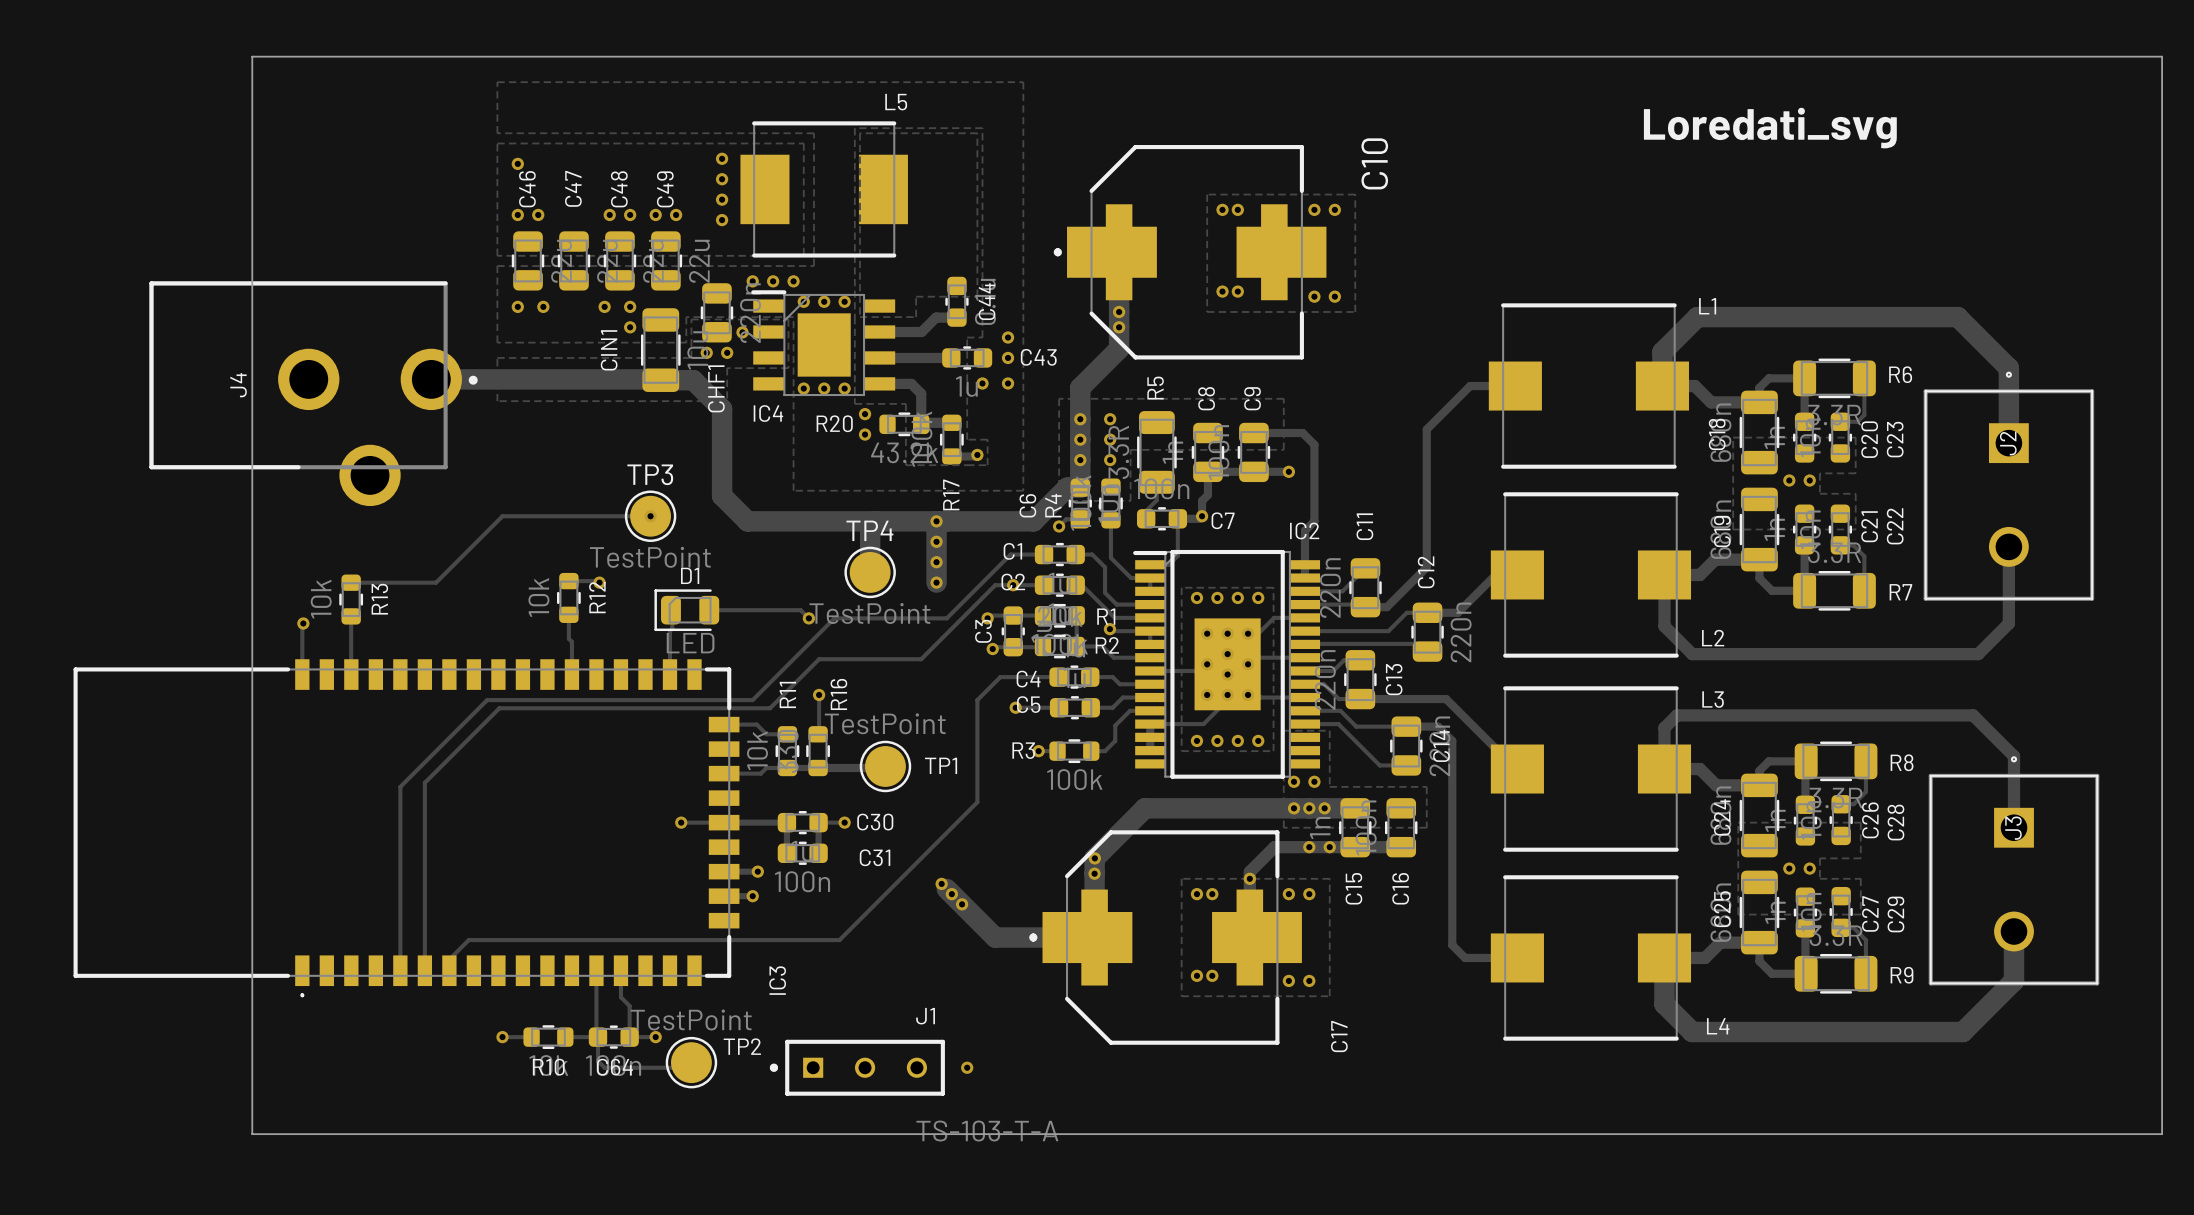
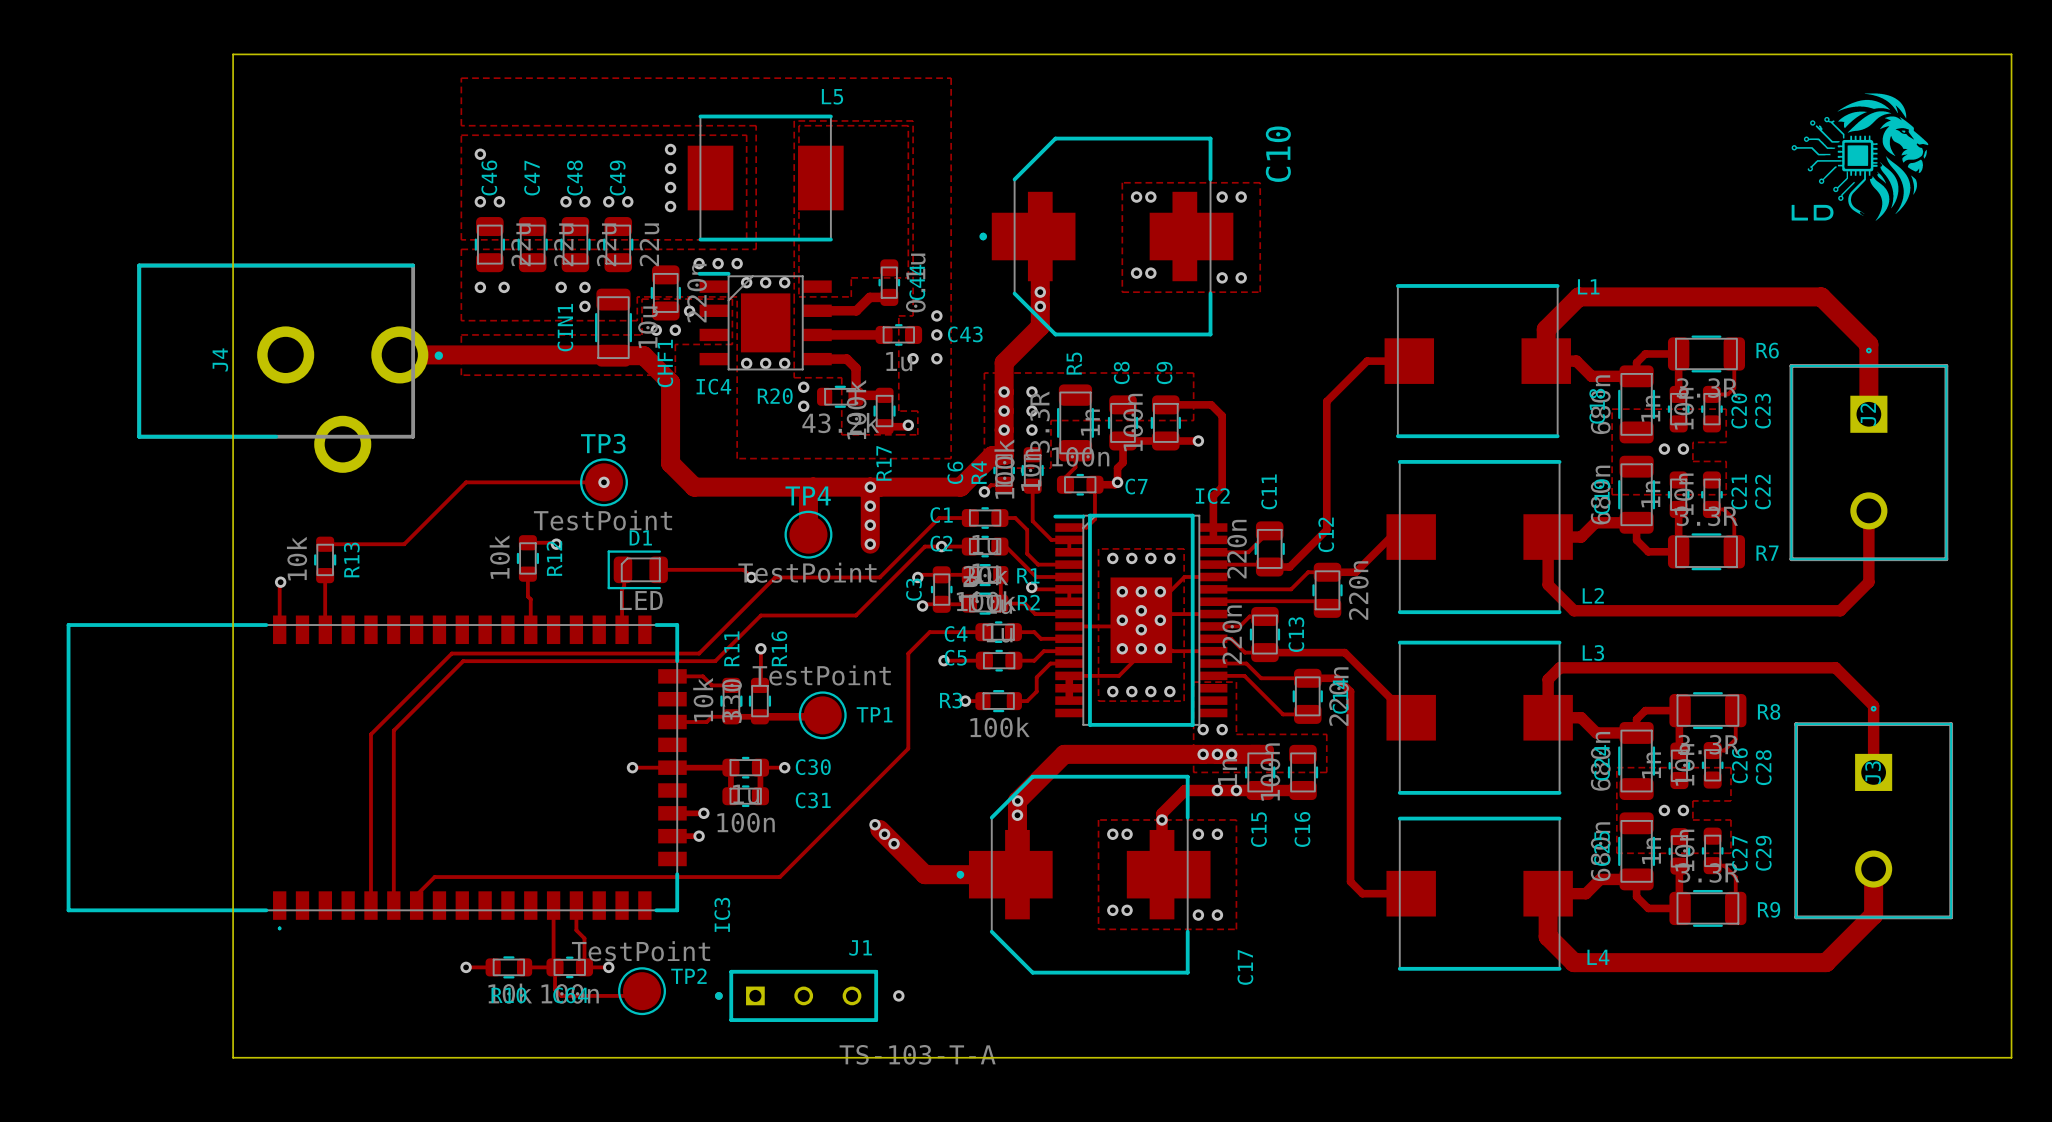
drawing: none -> [1791, 93, 1929, 221]
text: Loredati_svg (1770, 128) -> none

